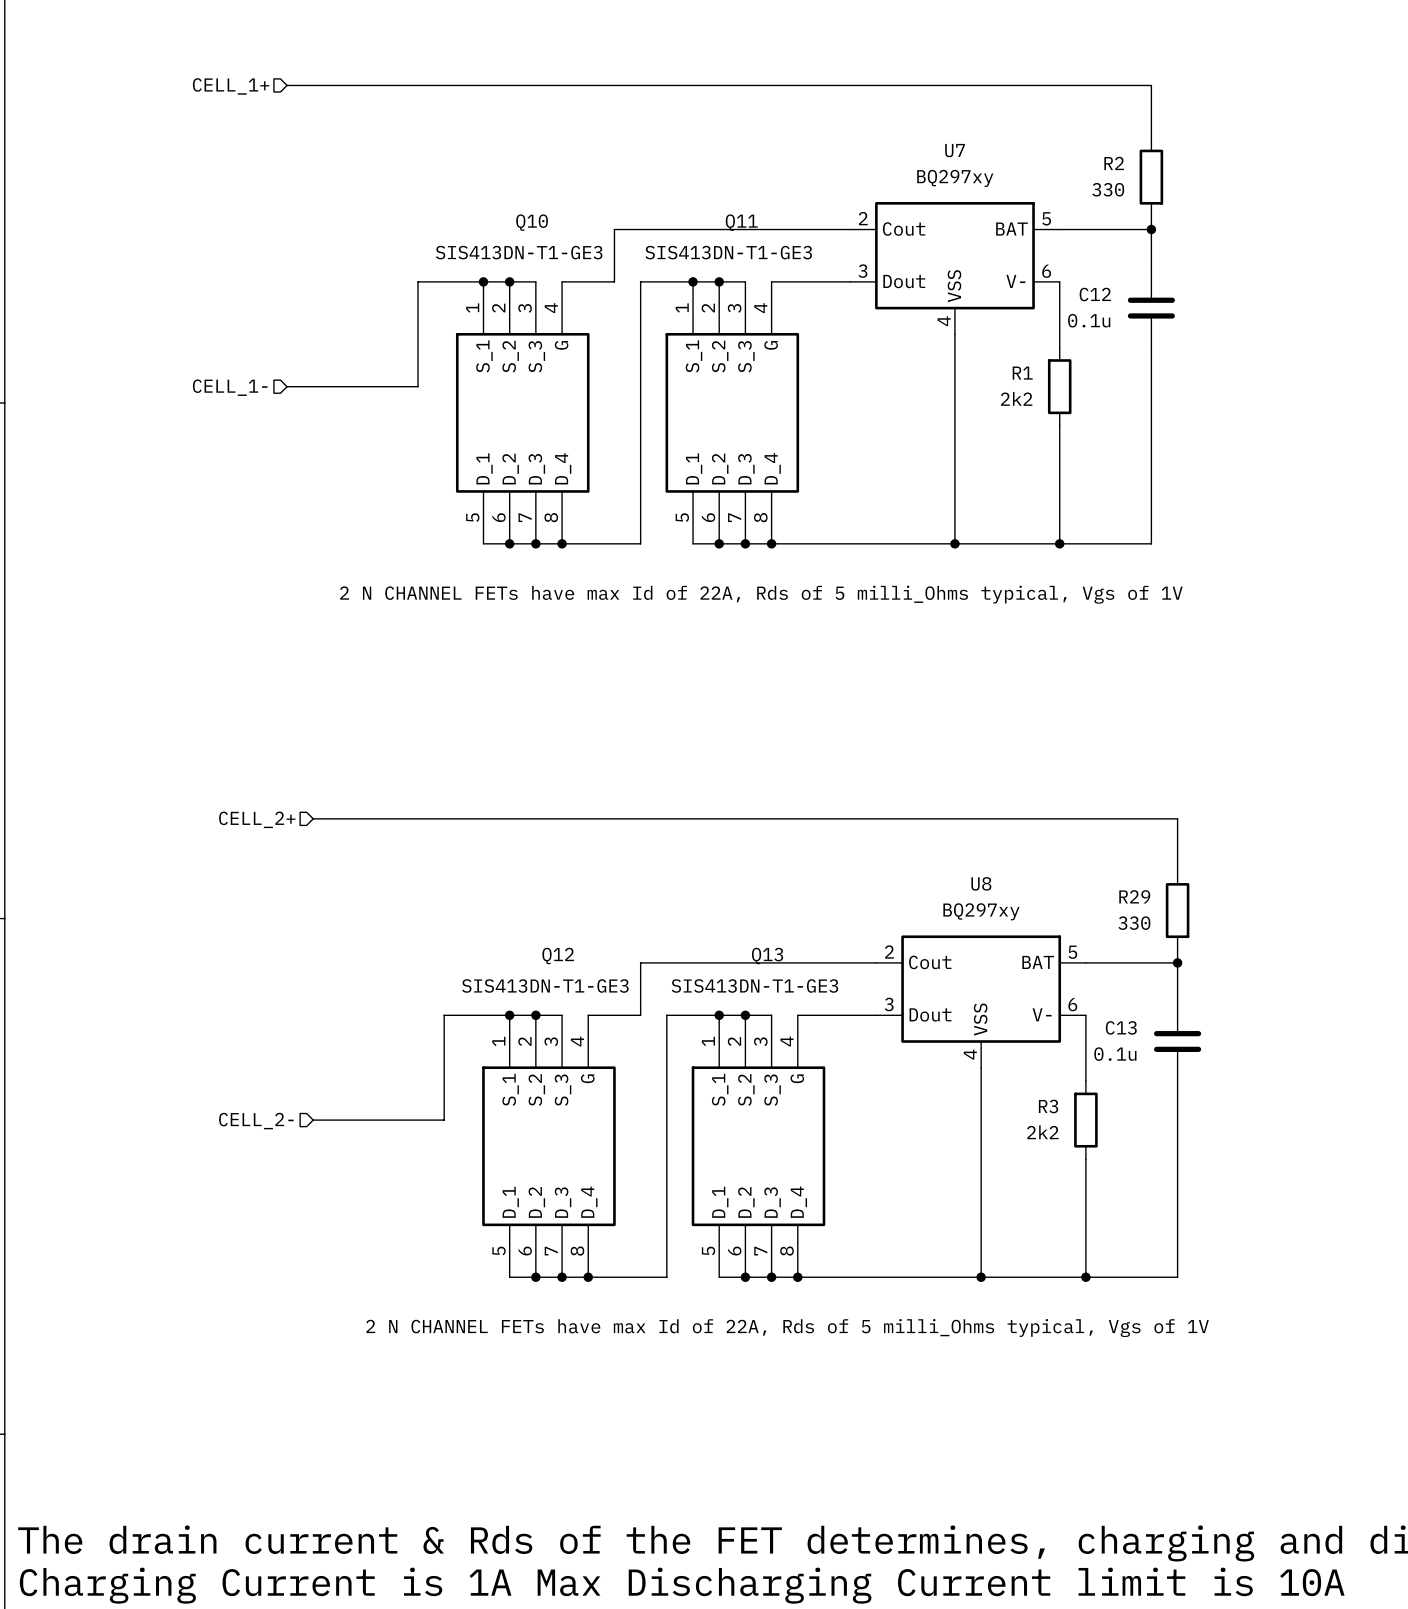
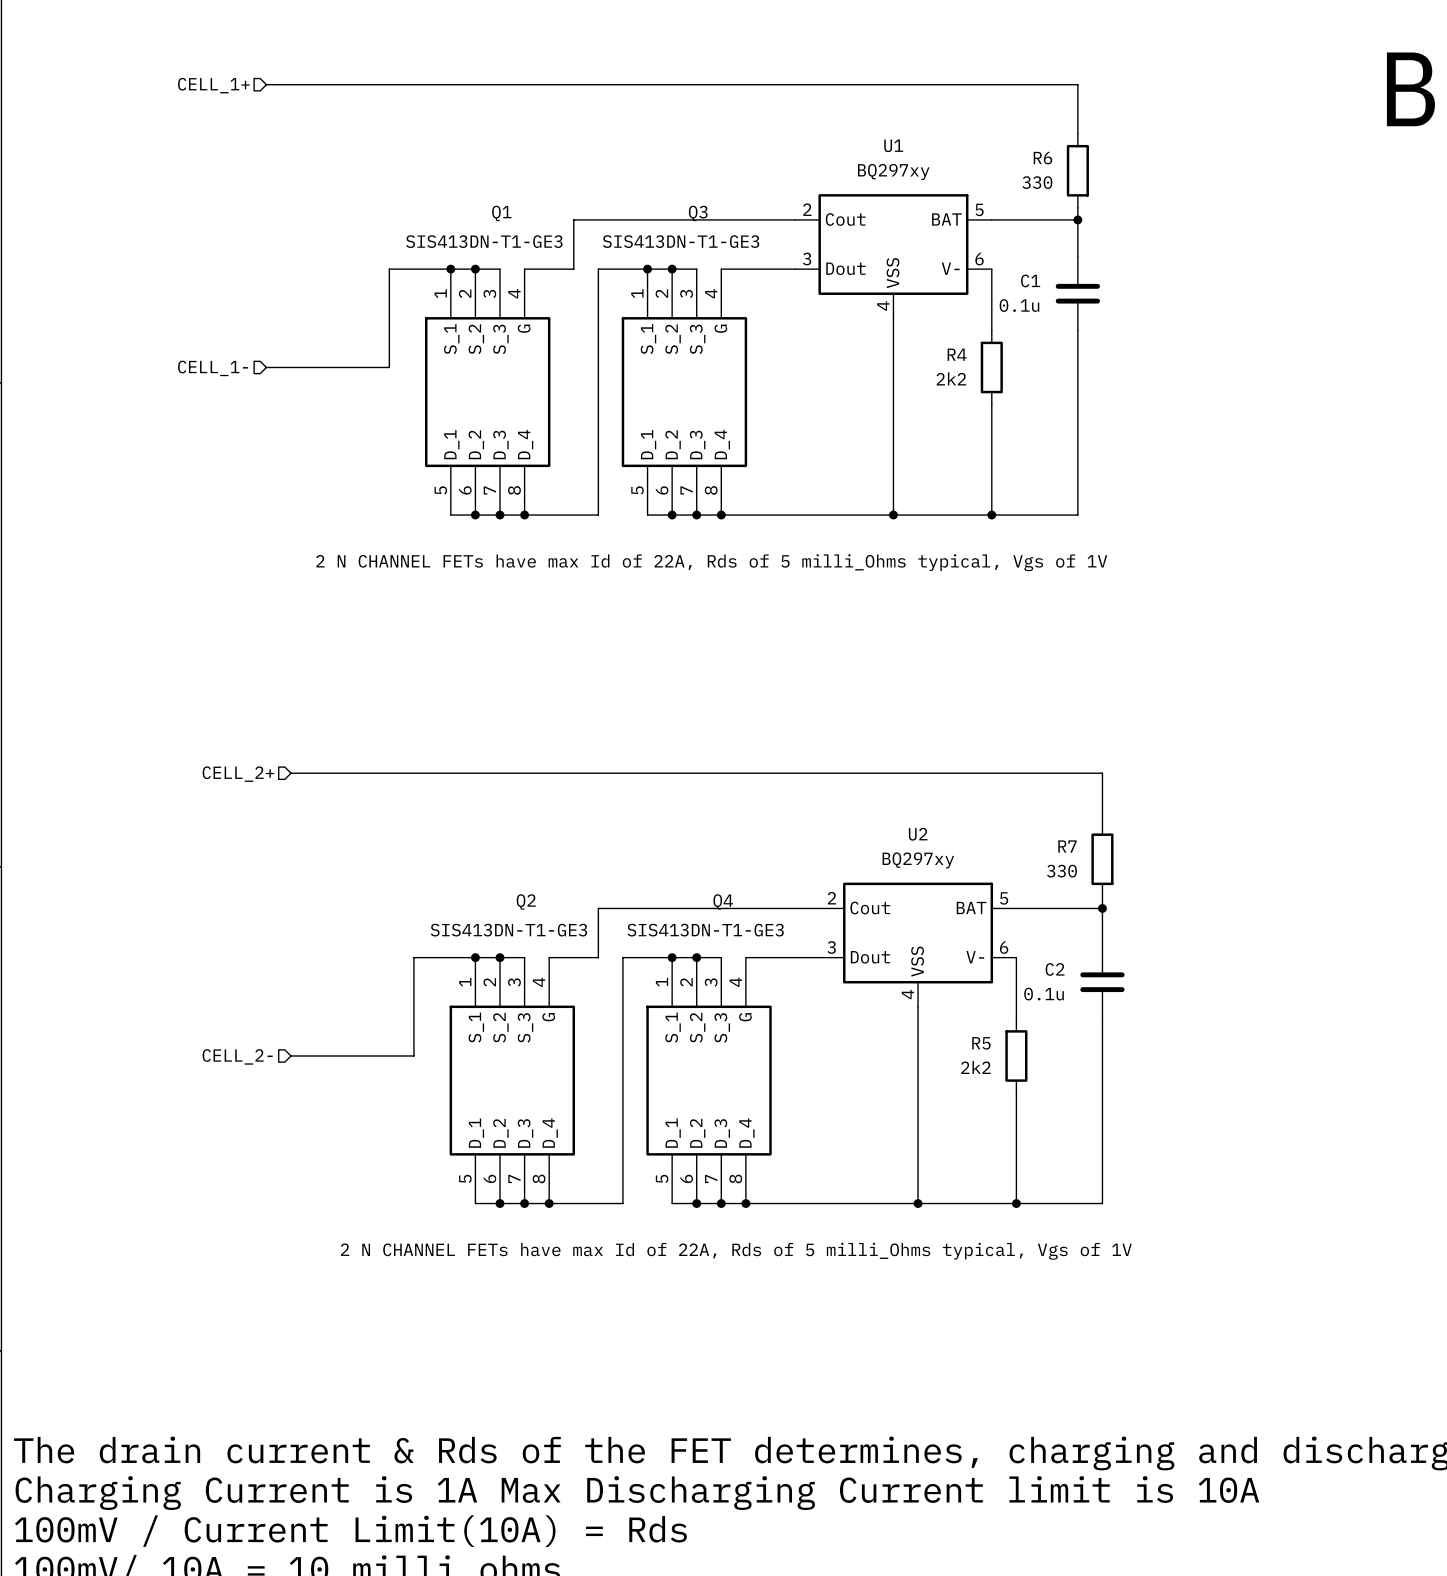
U7 name: U7 (955, 150) -> U1 (893, 145)
R2 name: R2 (1114, 163) -> R6 (1042, 158)
Q10 name: Q10 (532, 222) -> Q1 (501, 213)
Q11 name: Q11 (741, 222) -> Q3 (698, 213)
C12 name: C12 (1095, 294) -> C1 (1030, 280)
R1 name: R1 (1022, 373) -> R4 (957, 354)
U8 name: U8 (981, 883) -> U2 (918, 834)
R29 name: R29 (1134, 896) -> R7 (1067, 846)
Q12 name: Q12 (558, 956) -> Q2 (526, 901)
Q13 name: Q13 (767, 956) -> Q4 (723, 901)
C13 name: C13 (1121, 1027) -> C2 (1055, 969)
R3 name: R3 (1048, 1106) -> R5 (981, 1043)

